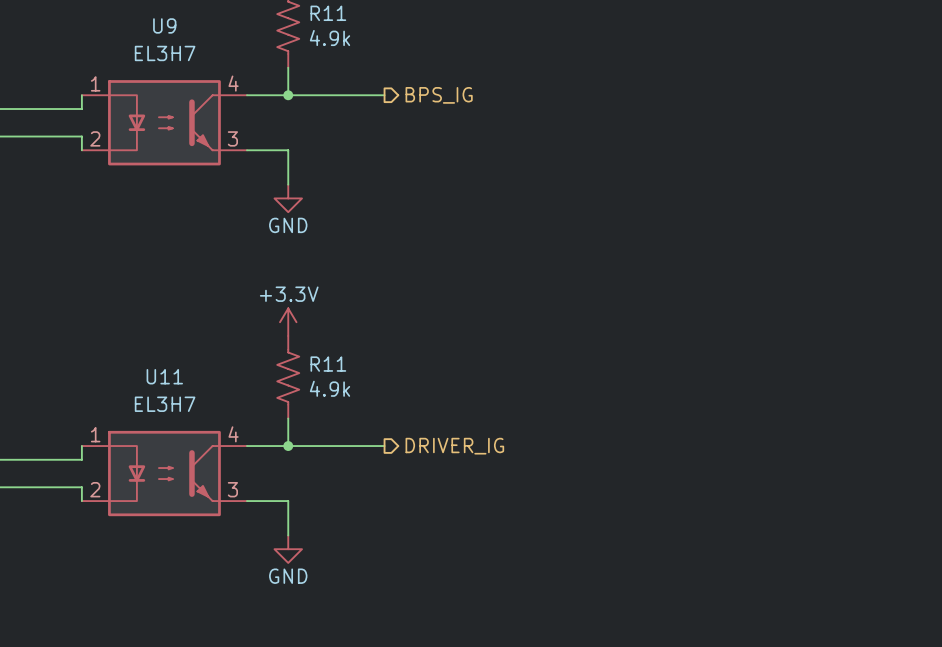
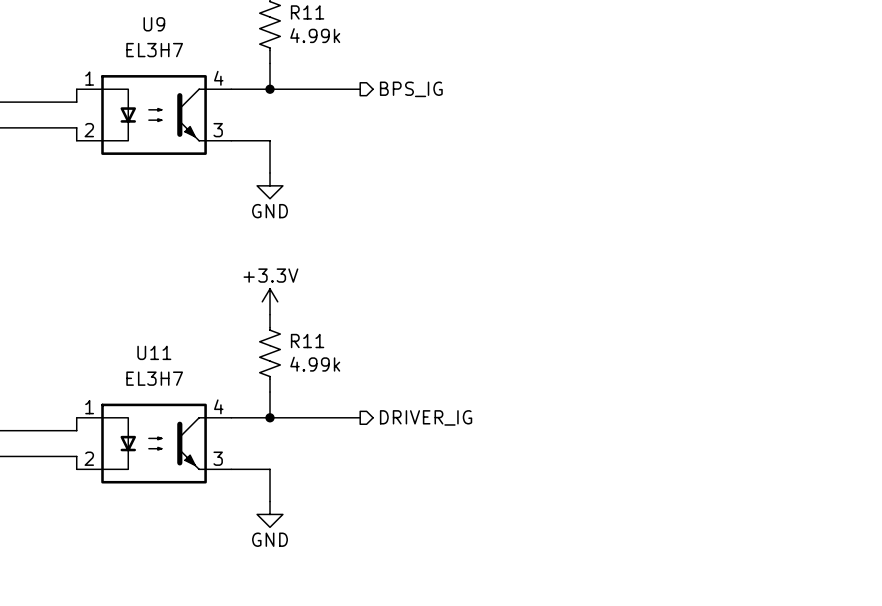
R11 value: 4.9k (329, 38) -> 4.99k (315, 35)
R11 value: 4.9k (329, 388) -> 4.99k (315, 364)

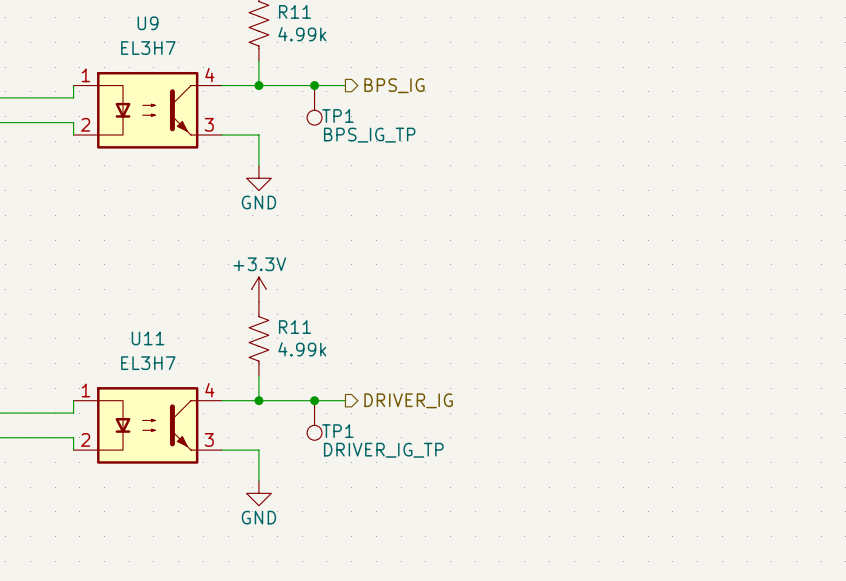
junction: none -> (314, 85)
TP1: none -> BPS_IG_TP (314, 105)
junction: none -> (314, 400)
TP1: none -> DRIVER_IG_TP (314, 420)

